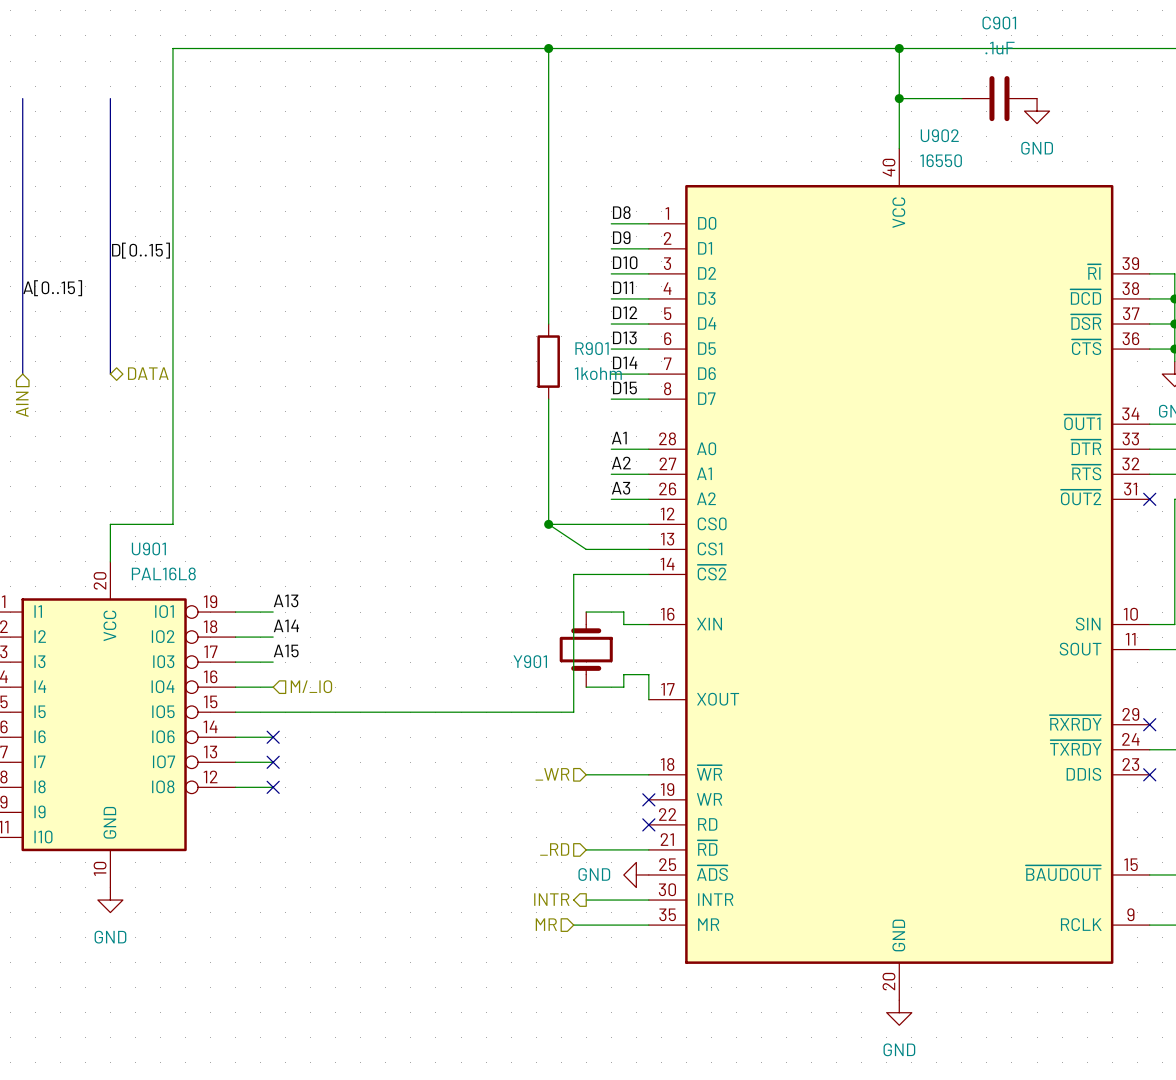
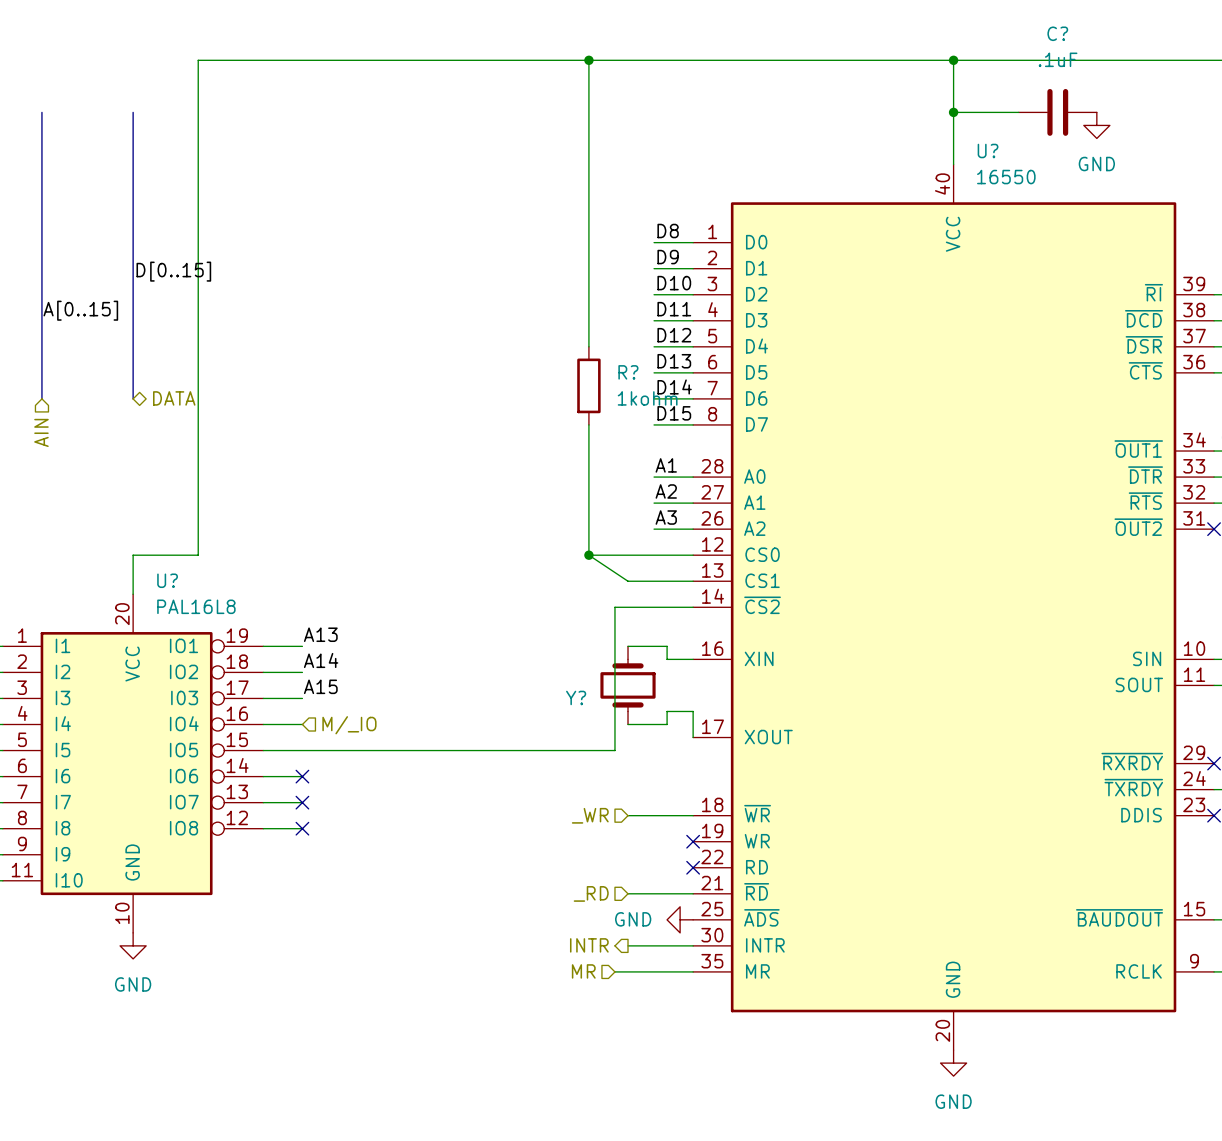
C901 name: C901 (999, 23) -> C? (1057, 33)
U902 name: U902 (939, 135) -> U? (988, 150)
R901 name: R901 (592, 348) -> R? (628, 372)
U901 name: U901 (148, 548) -> U? (167, 580)
Y901 name: Y901 (530, 661) -> Y? (576, 697)

